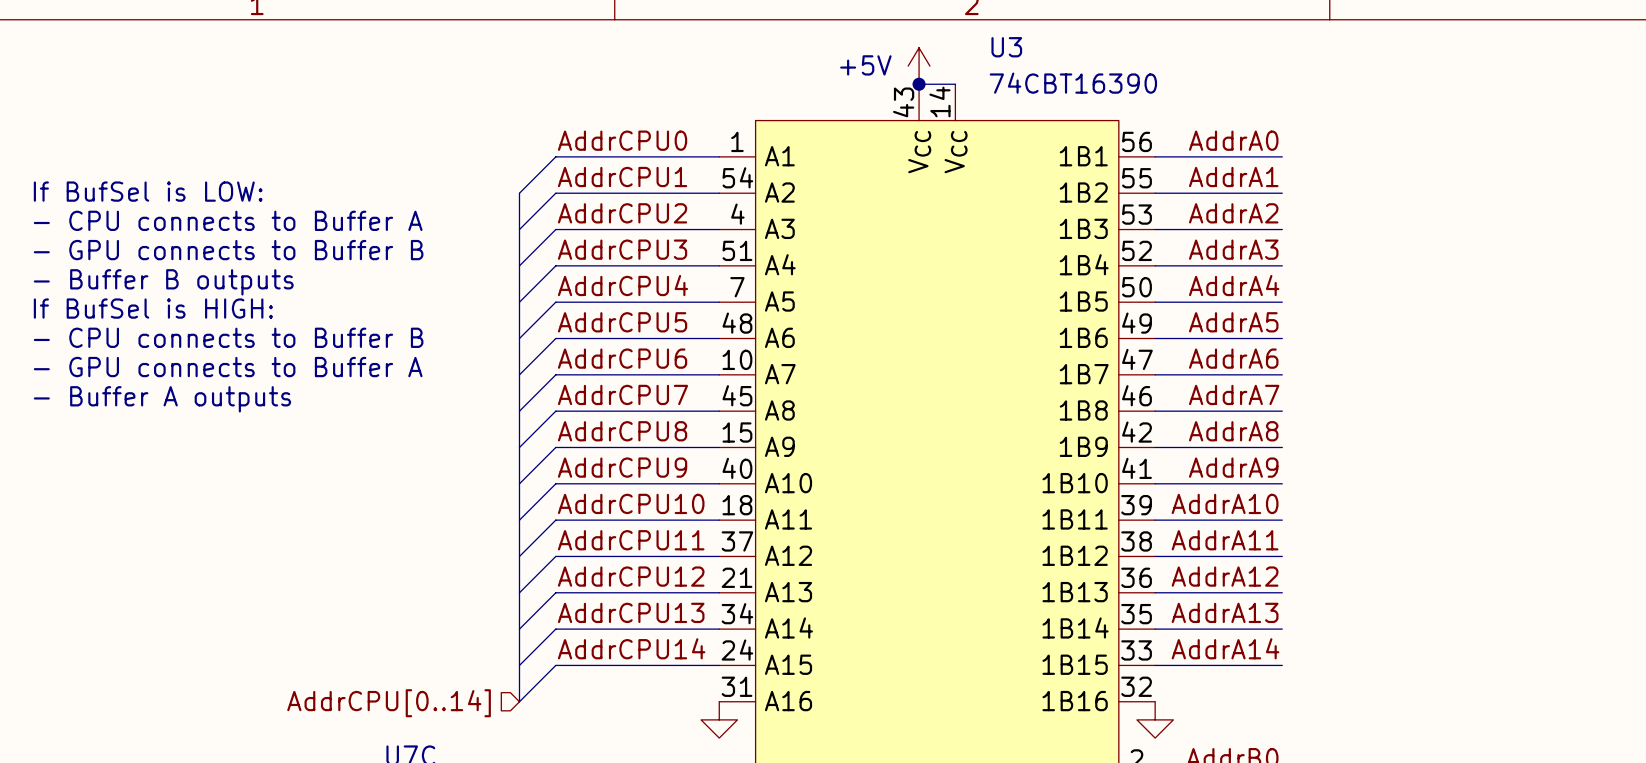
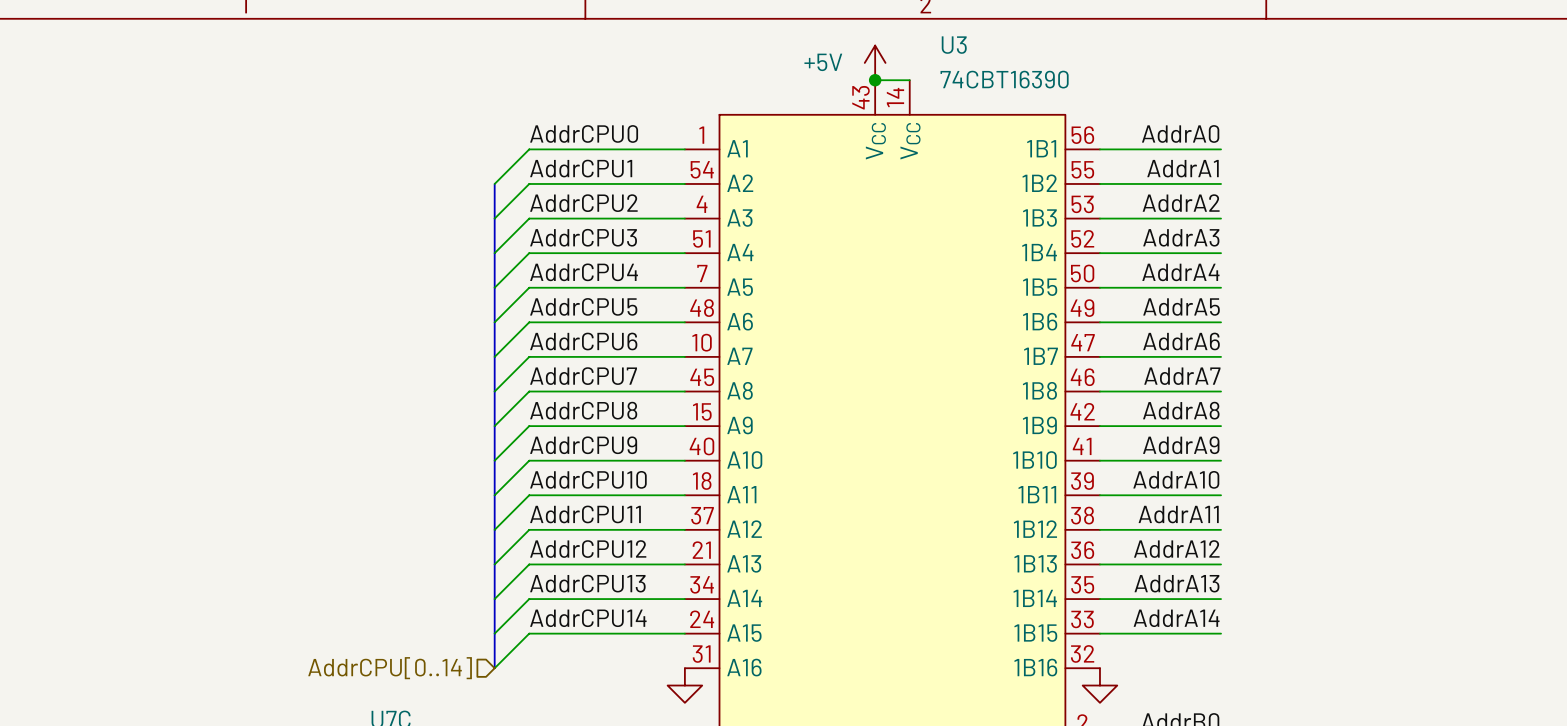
text: If BufSel is LOW: (148, 191) -> none
text: - CPU connects to Buffer A (228, 220) -> none
text: - GPU connects to Buffer B (228, 250) -> none
text: - Buffer B outputs (163, 282) -> none
text: If BufSel is HIGH: (153, 308) -> none
text: - CPU connects to Buffer B (228, 337) -> none
text: - GPU connects to Buffer A (228, 367) -> none
text: - Buffer A outputs (162, 399) -> none

